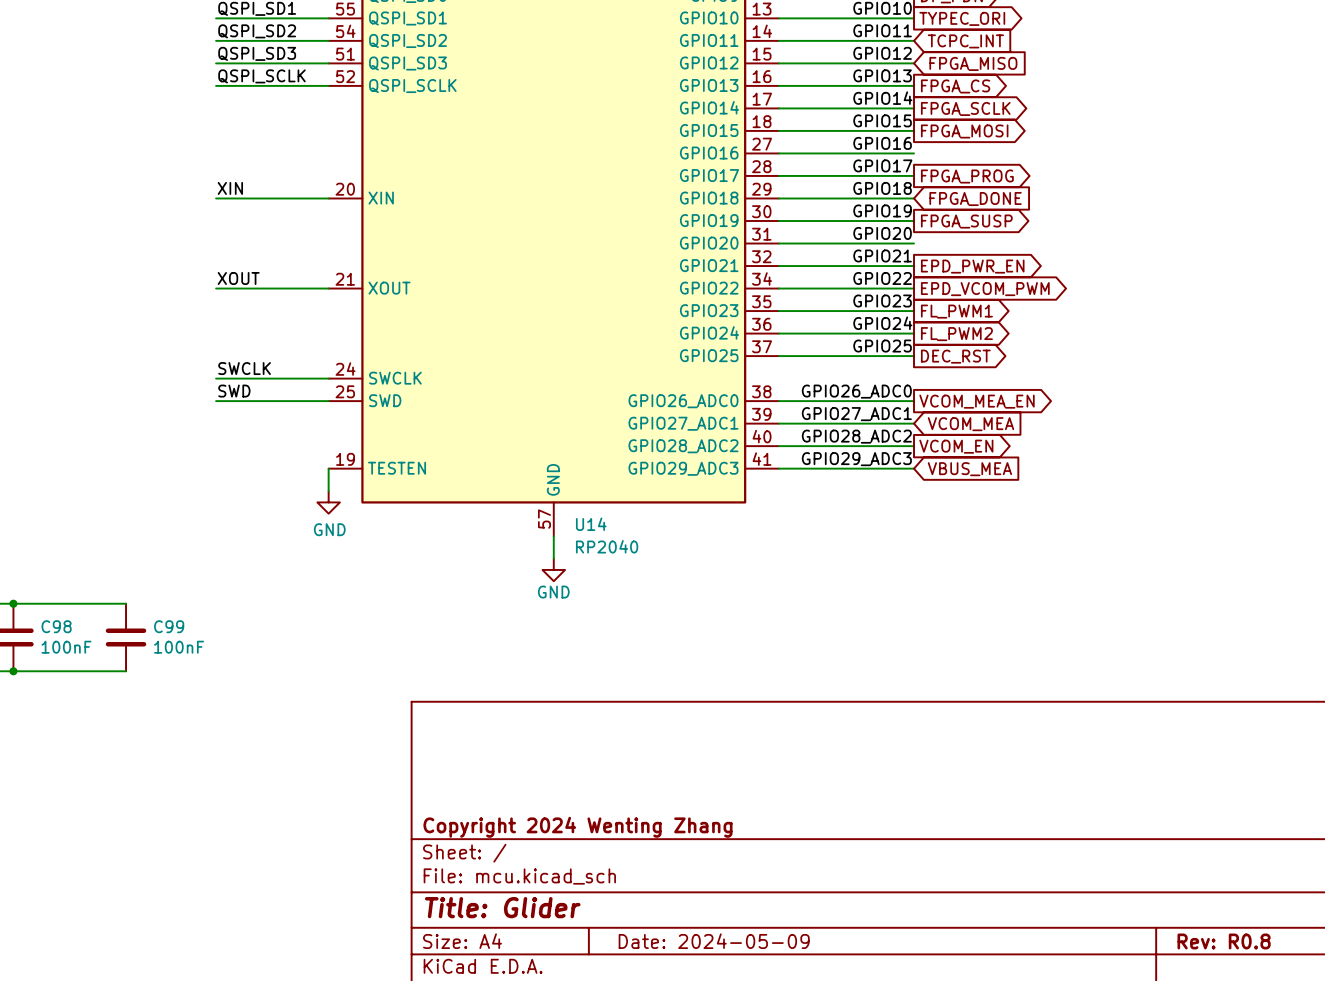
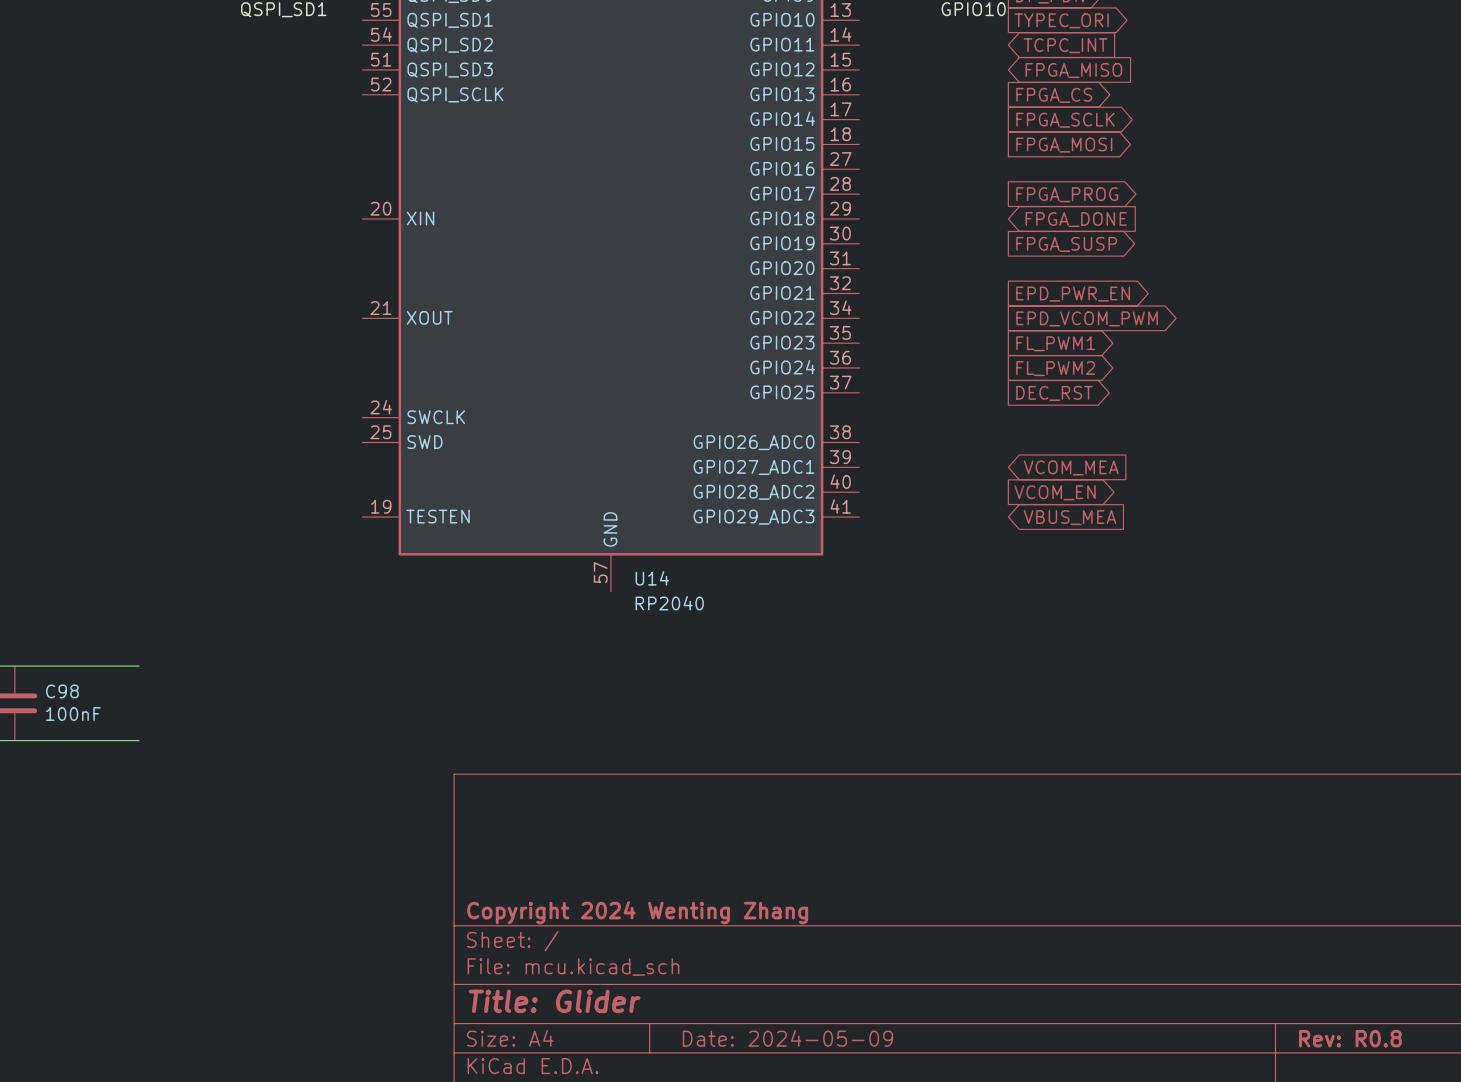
wire: (216, 18) (328, 18) -> none
wire: (778, 18) (914, 18) -> none
label: GPIO11 (882, 30) -> none
label: QSPI_SD2 (257, 31) -> none
wire: (216, 40) (328, 40) -> none
wire: (778, 40) (914, 40) -> none
label: QSPI_SD3 (257, 53) -> none
label: GPIO12 (882, 53) -> none
wire: (216, 63) (328, 63) -> none
wire: (778, 63) (914, 63) -> none
label: GPIO13 (882, 75) -> none
label: QSPI_SCLK (261, 76) -> none
wire: (216, 85) (328, 85) -> none
wire: (778, 85) (914, 85) -> none
label: GPIO14 (882, 98) -> none
wire: (778, 108) (914, 108) -> none
label: GPIO15 (882, 120) -> none
wire: (778, 130) (914, 130) -> none
label: GPIO16 (882, 143) -> none
wire: (778, 153) (914, 153) -> none
label: GPIO17 (882, 165) -> none
wire: (778, 175) (914, 175) -> none
label: XIN (230, 188) -> none
label: GPIO18 (882, 188) -> none
wire: (216, 198) (328, 198) -> none
wire: (778, 198) (914, 198) -> none
label: GPIO19 (882, 210) -> none
wire: (778, 220) (914, 220) -> none
label: GPIO20 (882, 233) -> none
wire: (778, 243) (914, 243) -> none
label: GPIO21 (882, 255) -> none
wire: (778, 266) (914, 266) -> none
label: XOUT (238, 278) -> none
label: GPIO22 (882, 278) -> none
wire: (216, 288) (328, 288) -> none
wire: (778, 288) (914, 288) -> none
label: GPIO23 (882, 301) -> none
wire: (778, 311) (914, 311) -> none
label: GPIO24 (882, 323) -> none
wire: (778, 333) (914, 333) -> none
label: GPIO25 (882, 346) -> none
wire: (778, 356) (914, 356) -> none
label: SWCLK (244, 368) -> none
wire: (216, 378) (328, 378) -> none
label: SWD (234, 391) -> none
label: GPIO26_ADC0 (856, 391) -> none
wire: (216, 401) (328, 401) -> none
wire: (778, 401) (914, 401) -> none
global label: VCOM_MEA_EN (977, 401) -> none
label: GPIO27_ADC1 (856, 414) -> none
wire: (778, 423) (914, 423) -> none
label: GPIO28_ADC2 (856, 436) -> none
wire: (778, 446) (914, 446) -> none
label: GPIO29_ADC3 (856, 459) -> none
wire: (328, 468) (328, 491) -> none
wire: (778, 468) (914, 468) -> none
power symbol: GND (328, 502) -> none
wire: (553, 536) (553, 558) -> none
power symbol: GND (553, 569) -> none
junction: (13, 603) -> none
C99: 100nF (126, 637) -> none
junction: (13, 671) -> none

